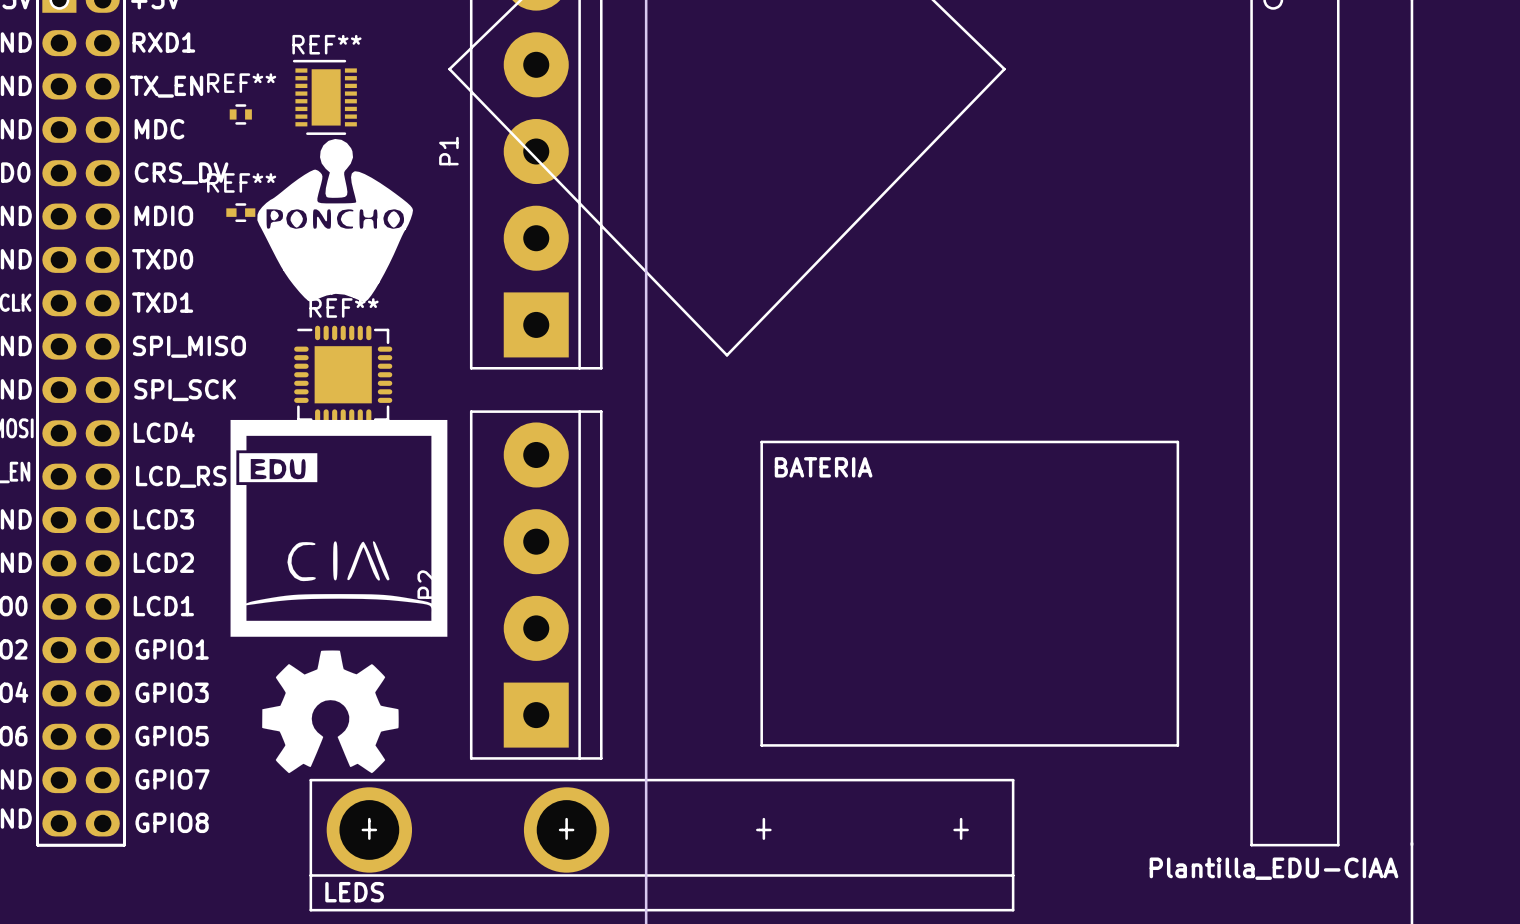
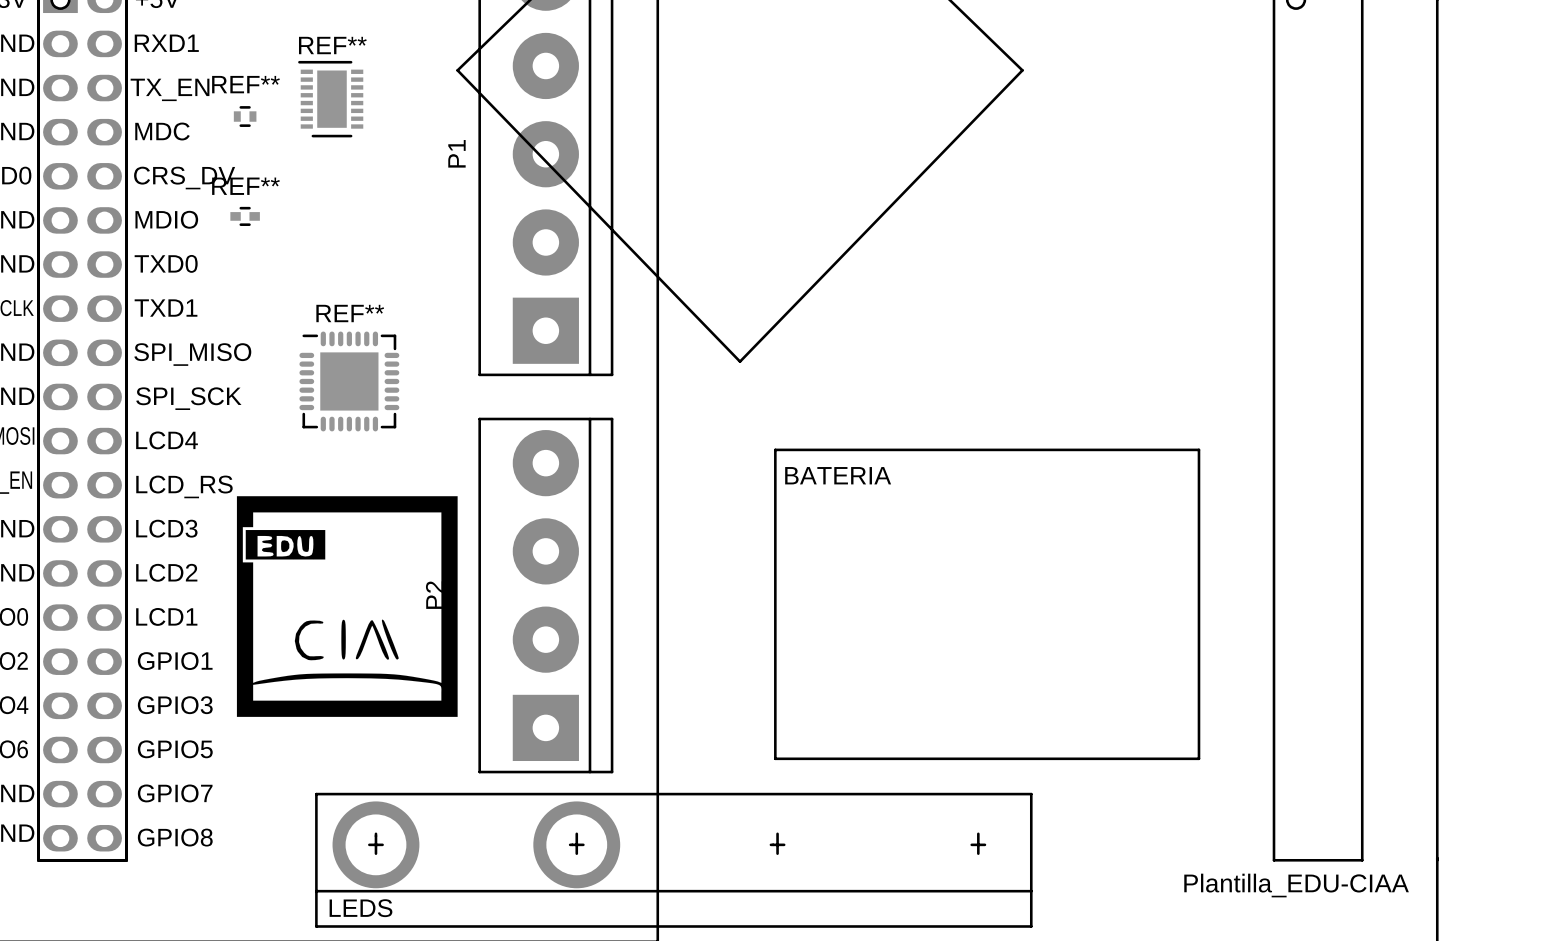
drawing: [257, 138, 413, 302] -> none
drawing position: (338, 528) -> (347, 606)
drawing: [262, 650, 399, 774] -> none

